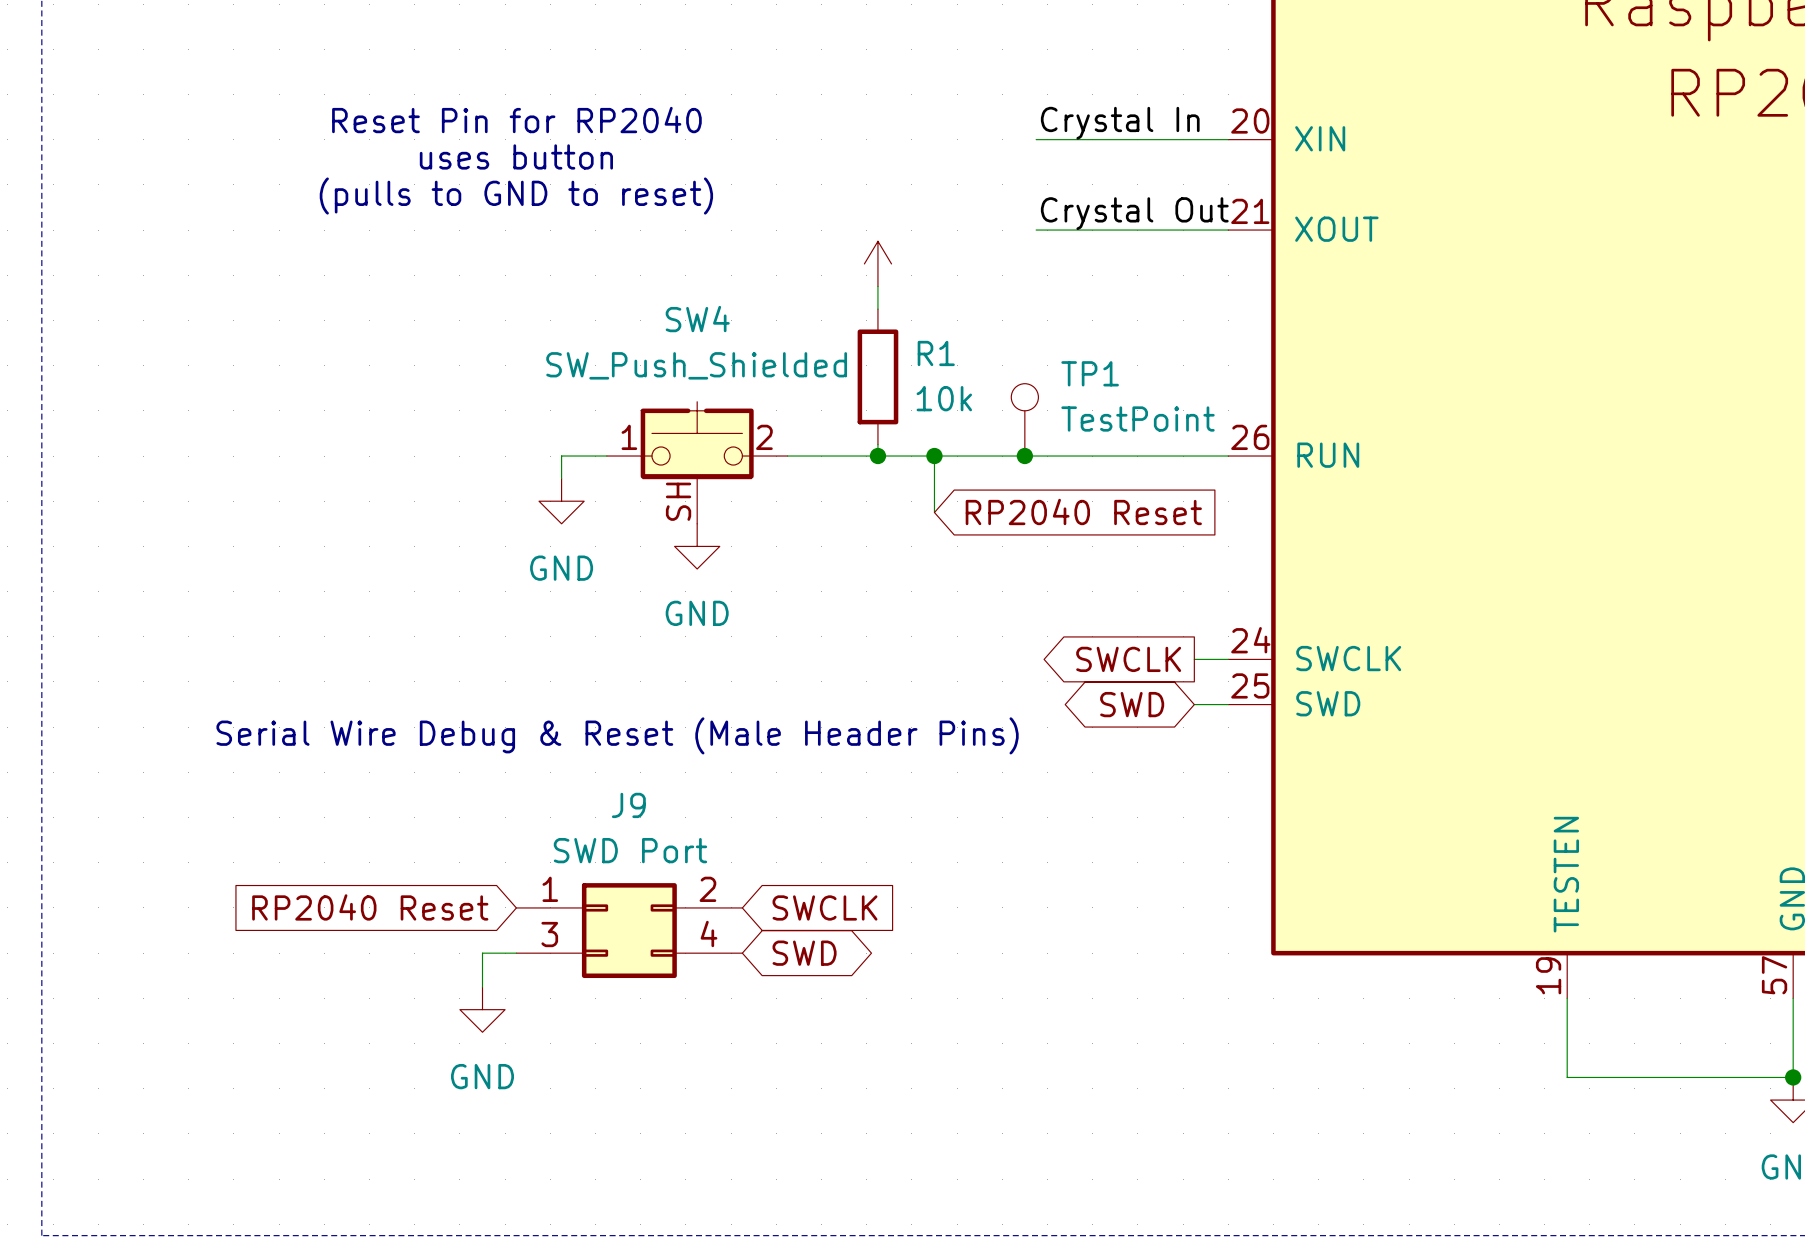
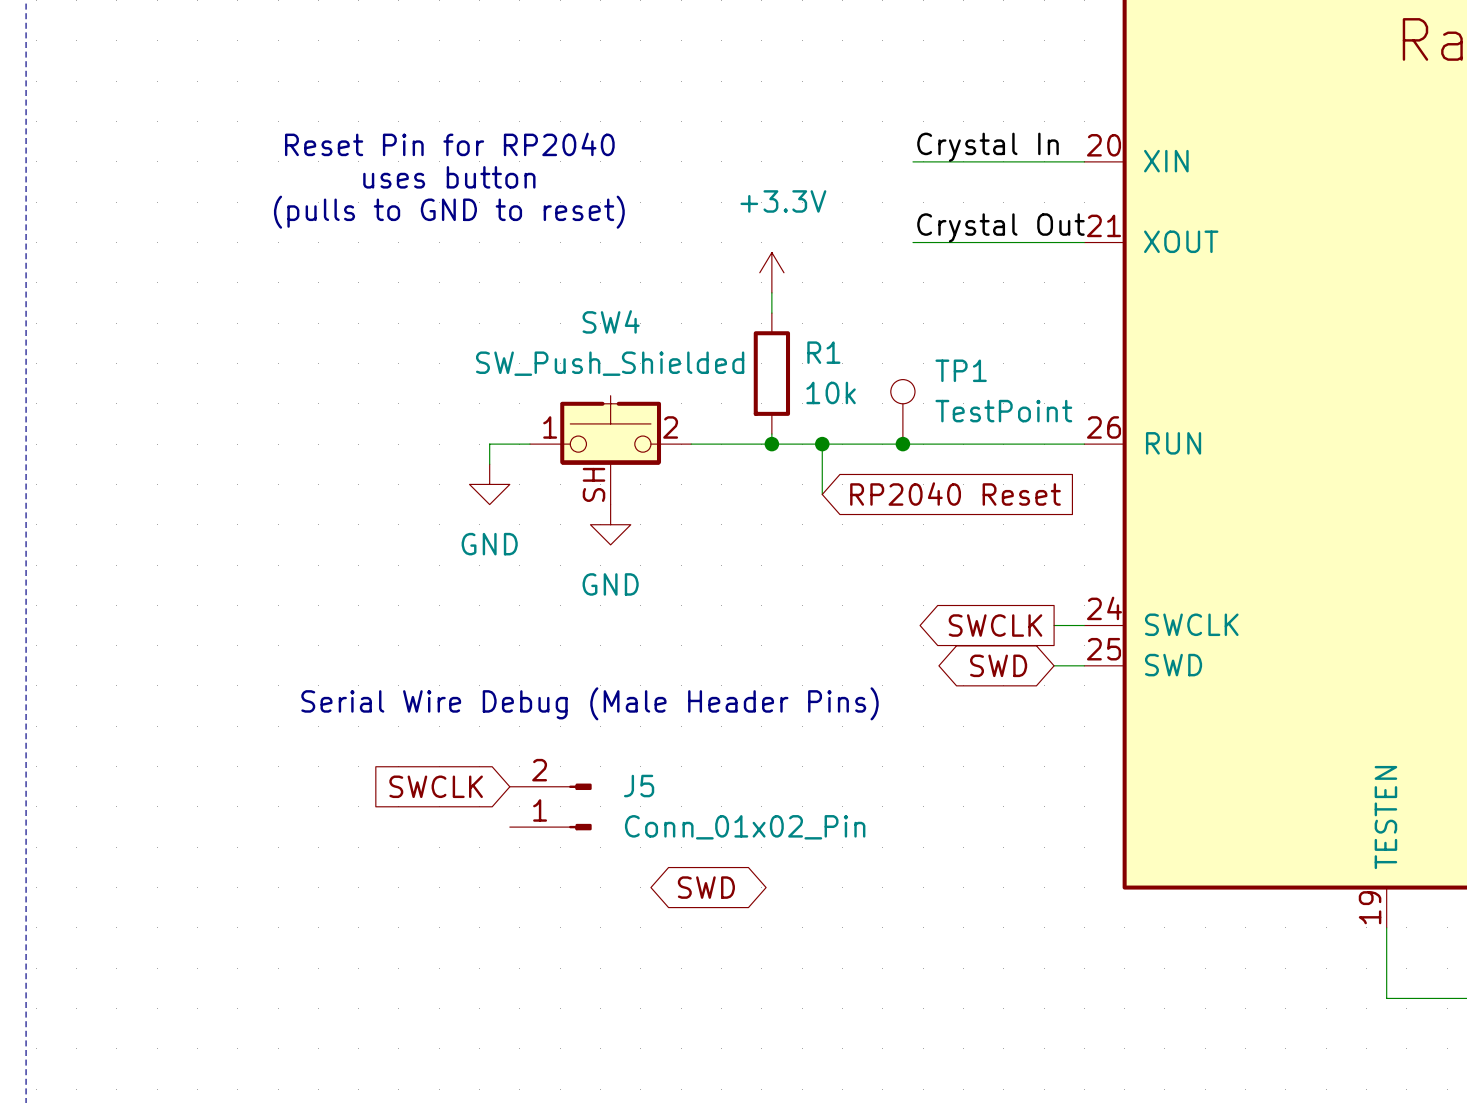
power symbol text: none -> +3.3V (783, 201)
text: Serial Wire Debug & Reset (Male Header Pins) (617, 735) -> Serial Wire Debug (Male Header Pins) (589, 703)
J5: none -> Conn_01x02_Pin (550, 806)
global label: RP2040 Reset (370, 907) -> none
global label rotation: 0° (825, 907) -> 180° (436, 786)
global label position: SWCLK (825, 907) -> SWCLK (436, 786)
J9: SWD Port (629, 930) -> none
wire: (516, 953) (482, 953) (482, 987) -> none
power symbol: GND (482, 1009) -> none

